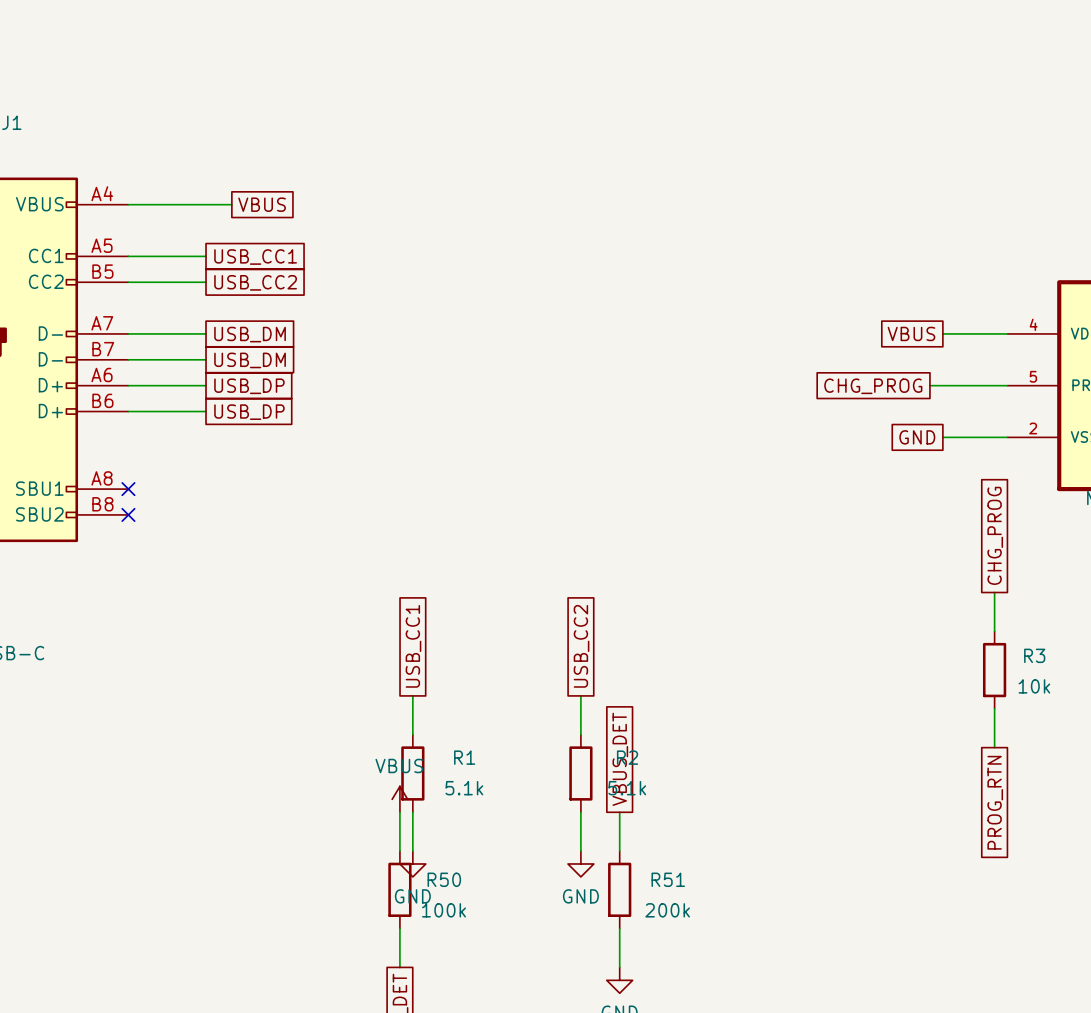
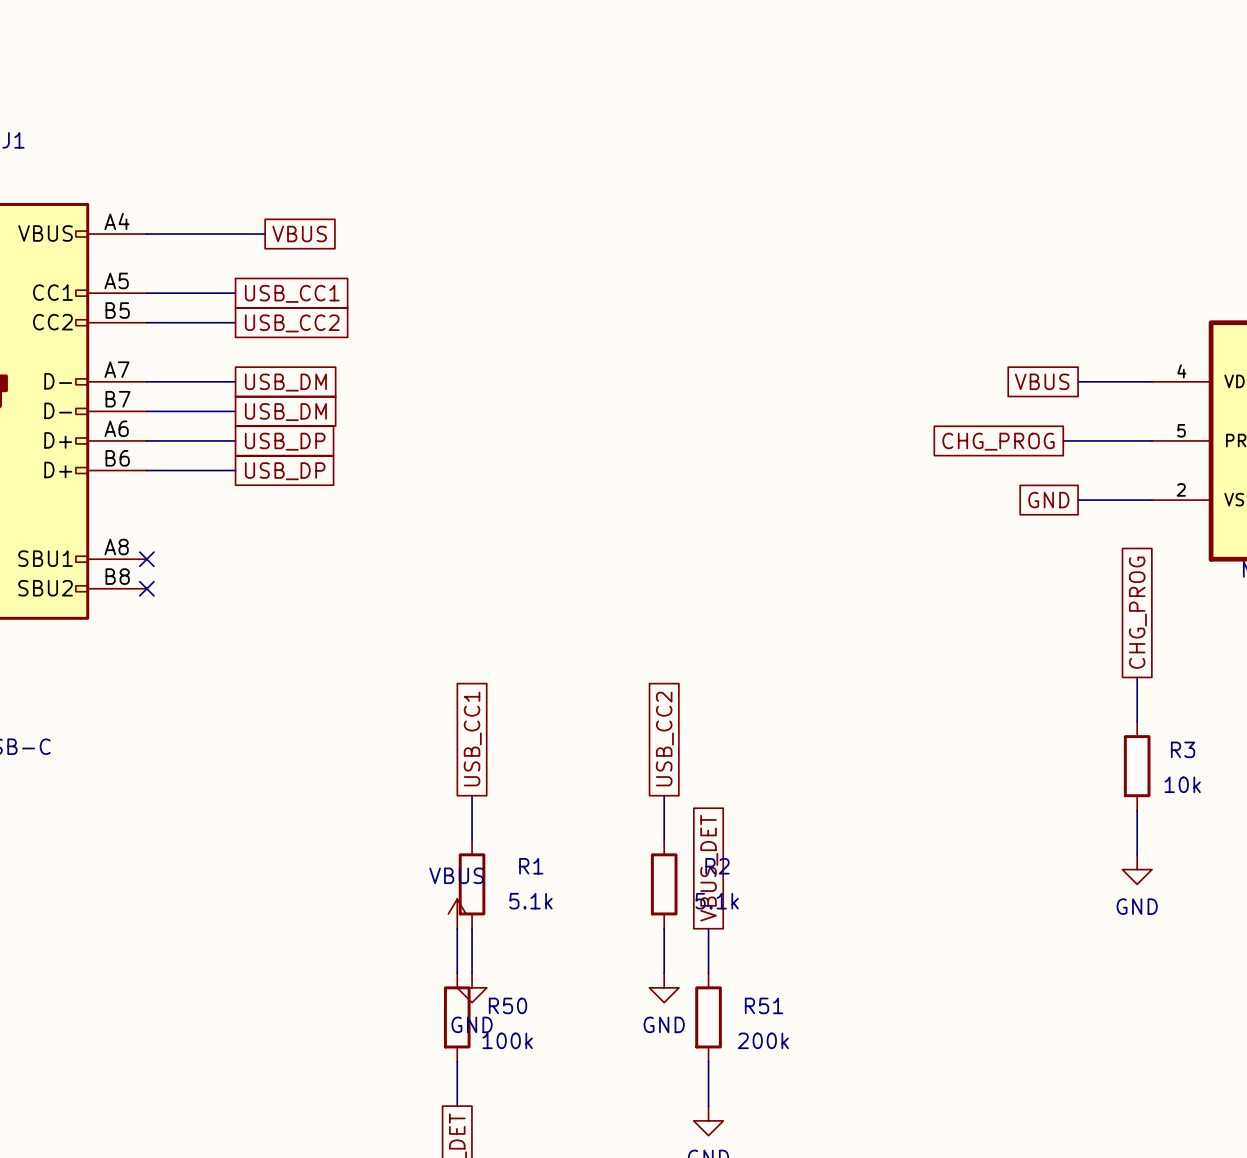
power symbol: none -> GND (1137, 869)
global label: PROG_RTN (995, 802) -> none

